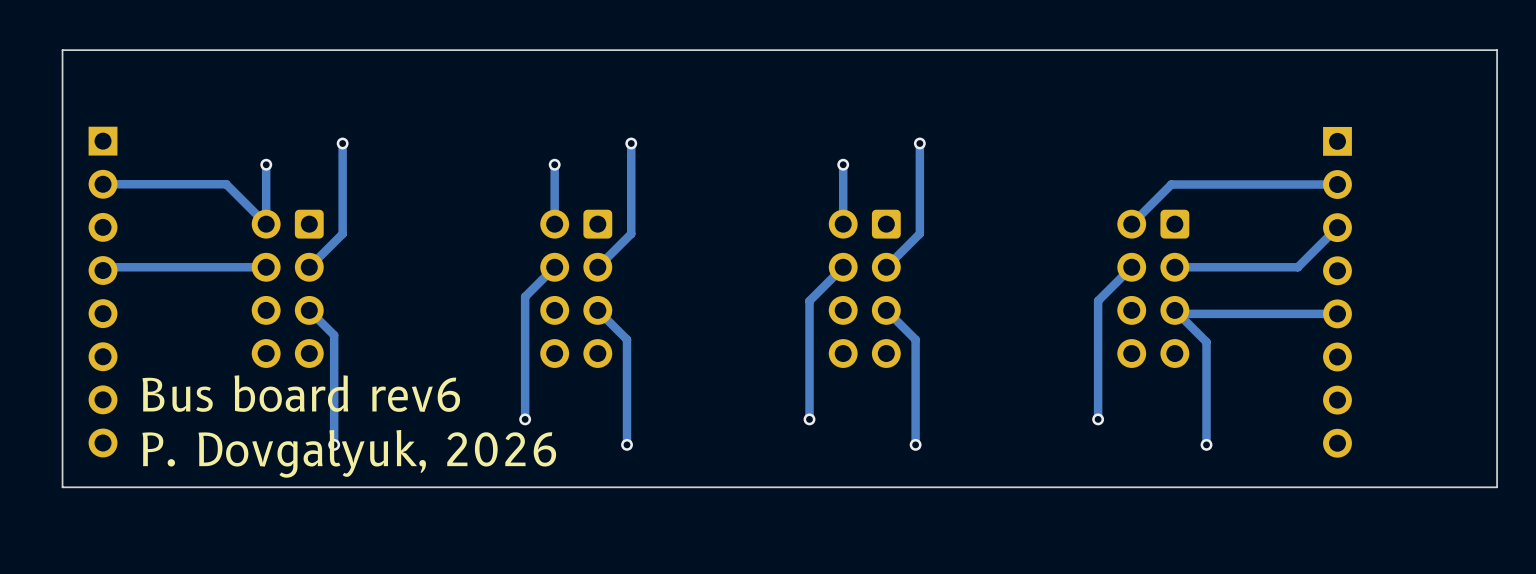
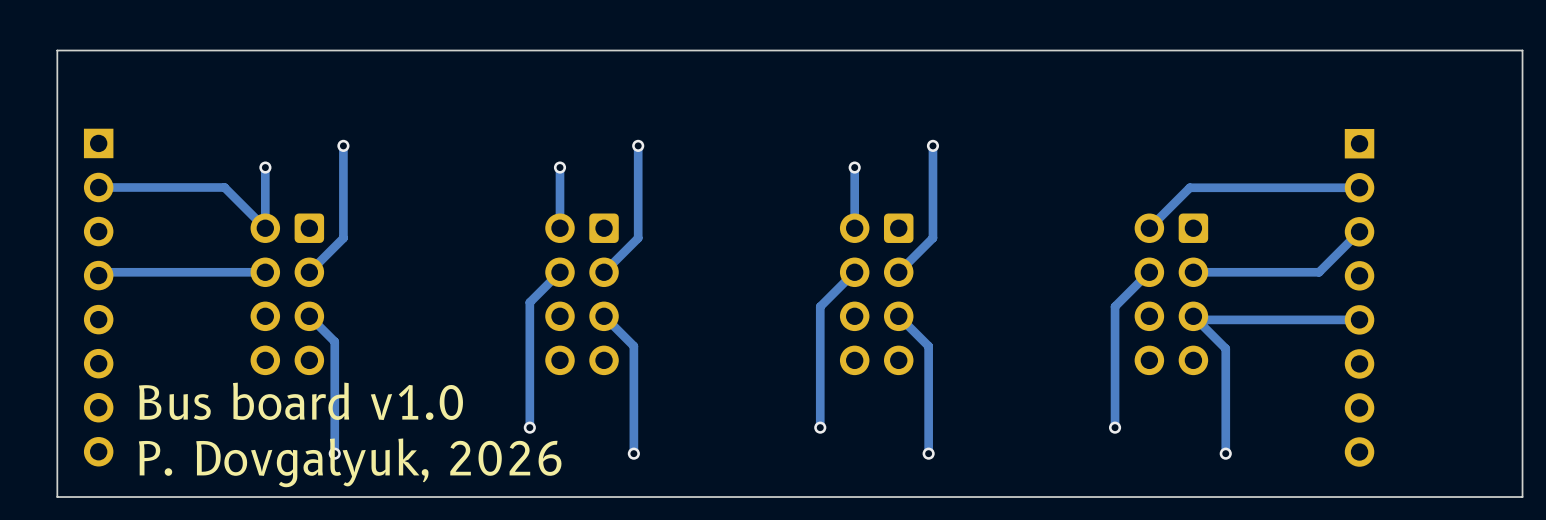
text: Bus board rev6 (301, 393) -> Bus board v1.0 (300, 401)

